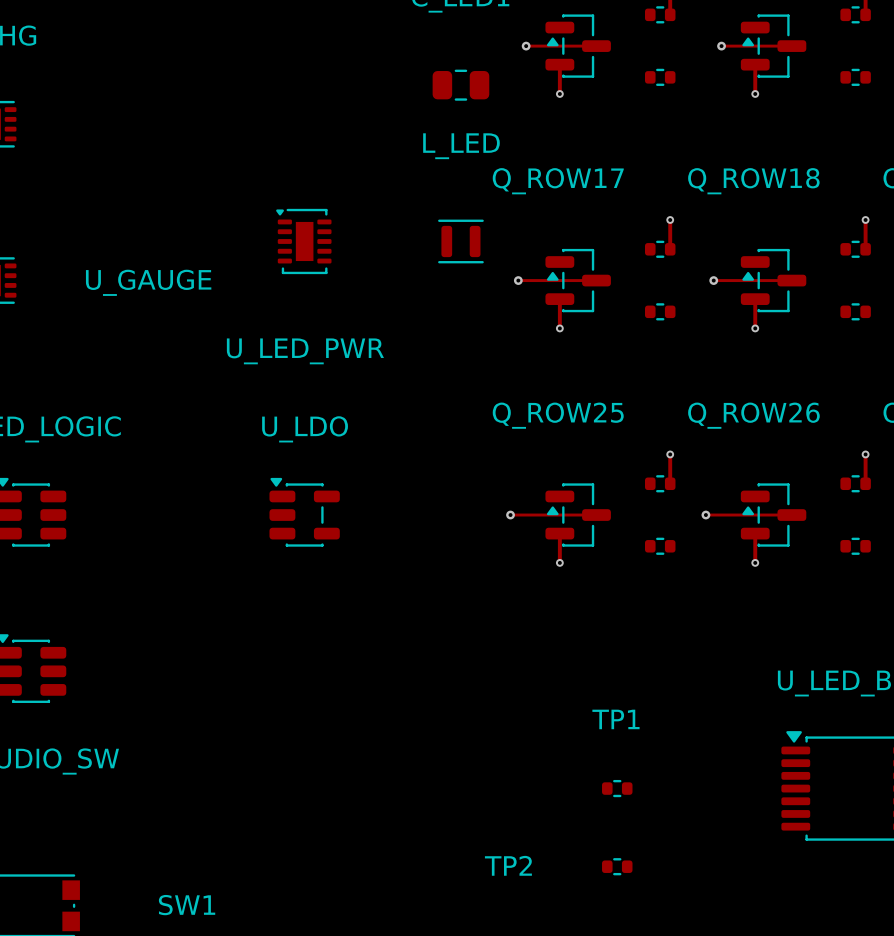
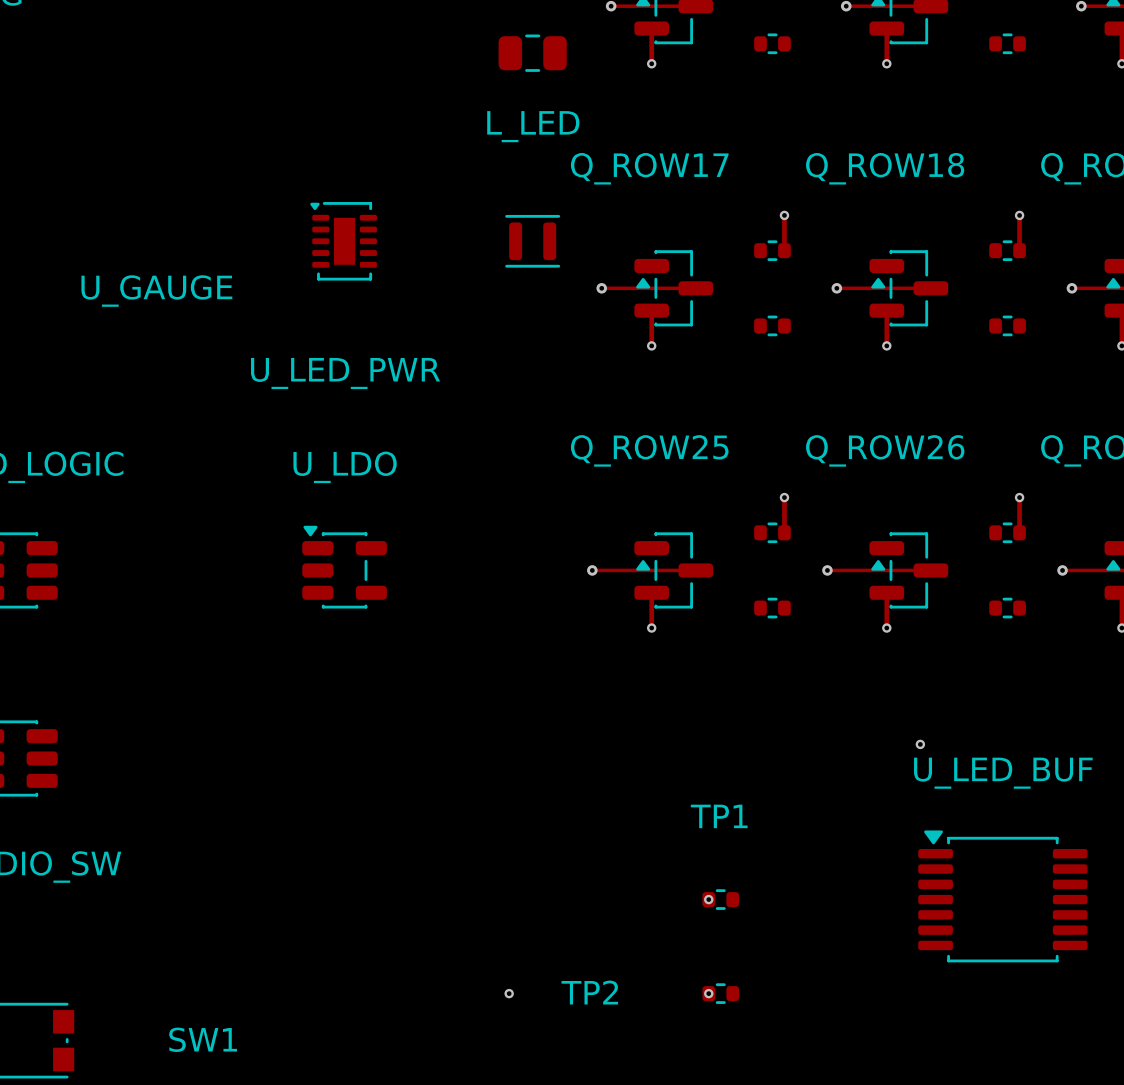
via: none -> (920, 744)
via: none -> (708, 899)
via: none -> (509, 993)
via: none -> (708, 993)

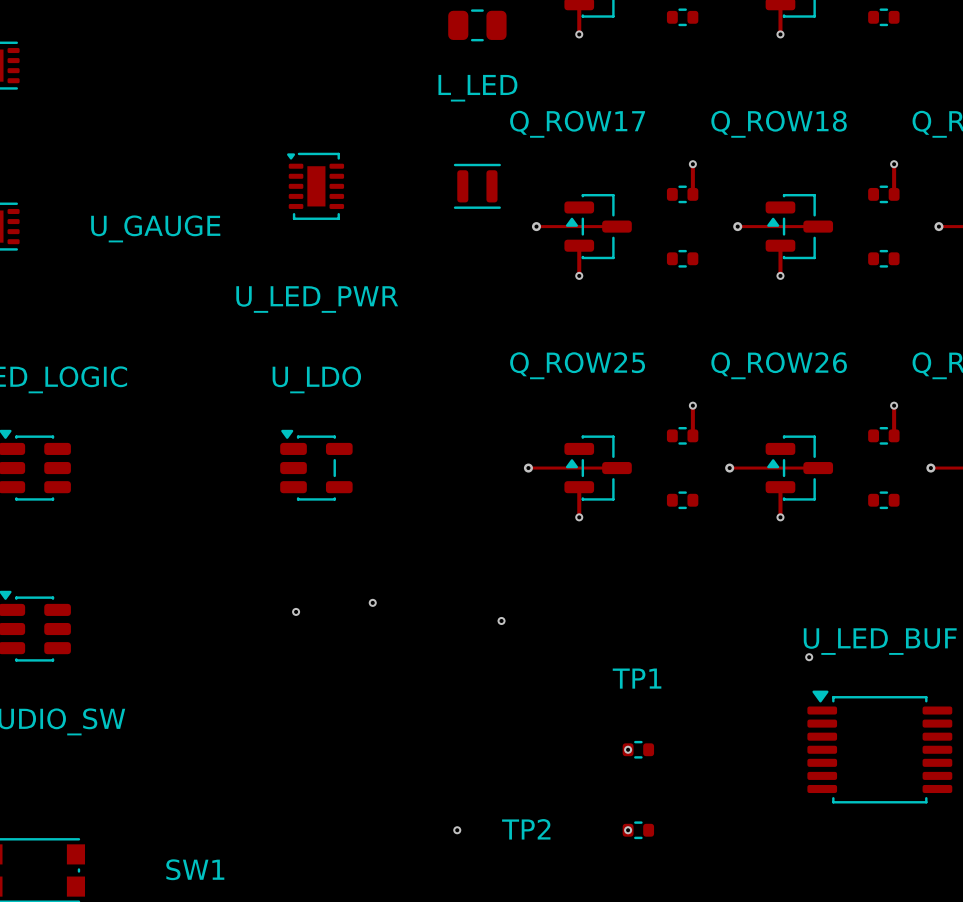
via: none -> (372, 602)
via: none -> (296, 611)
via position: (920, 744) -> (809, 657)
via: none -> (501, 620)

